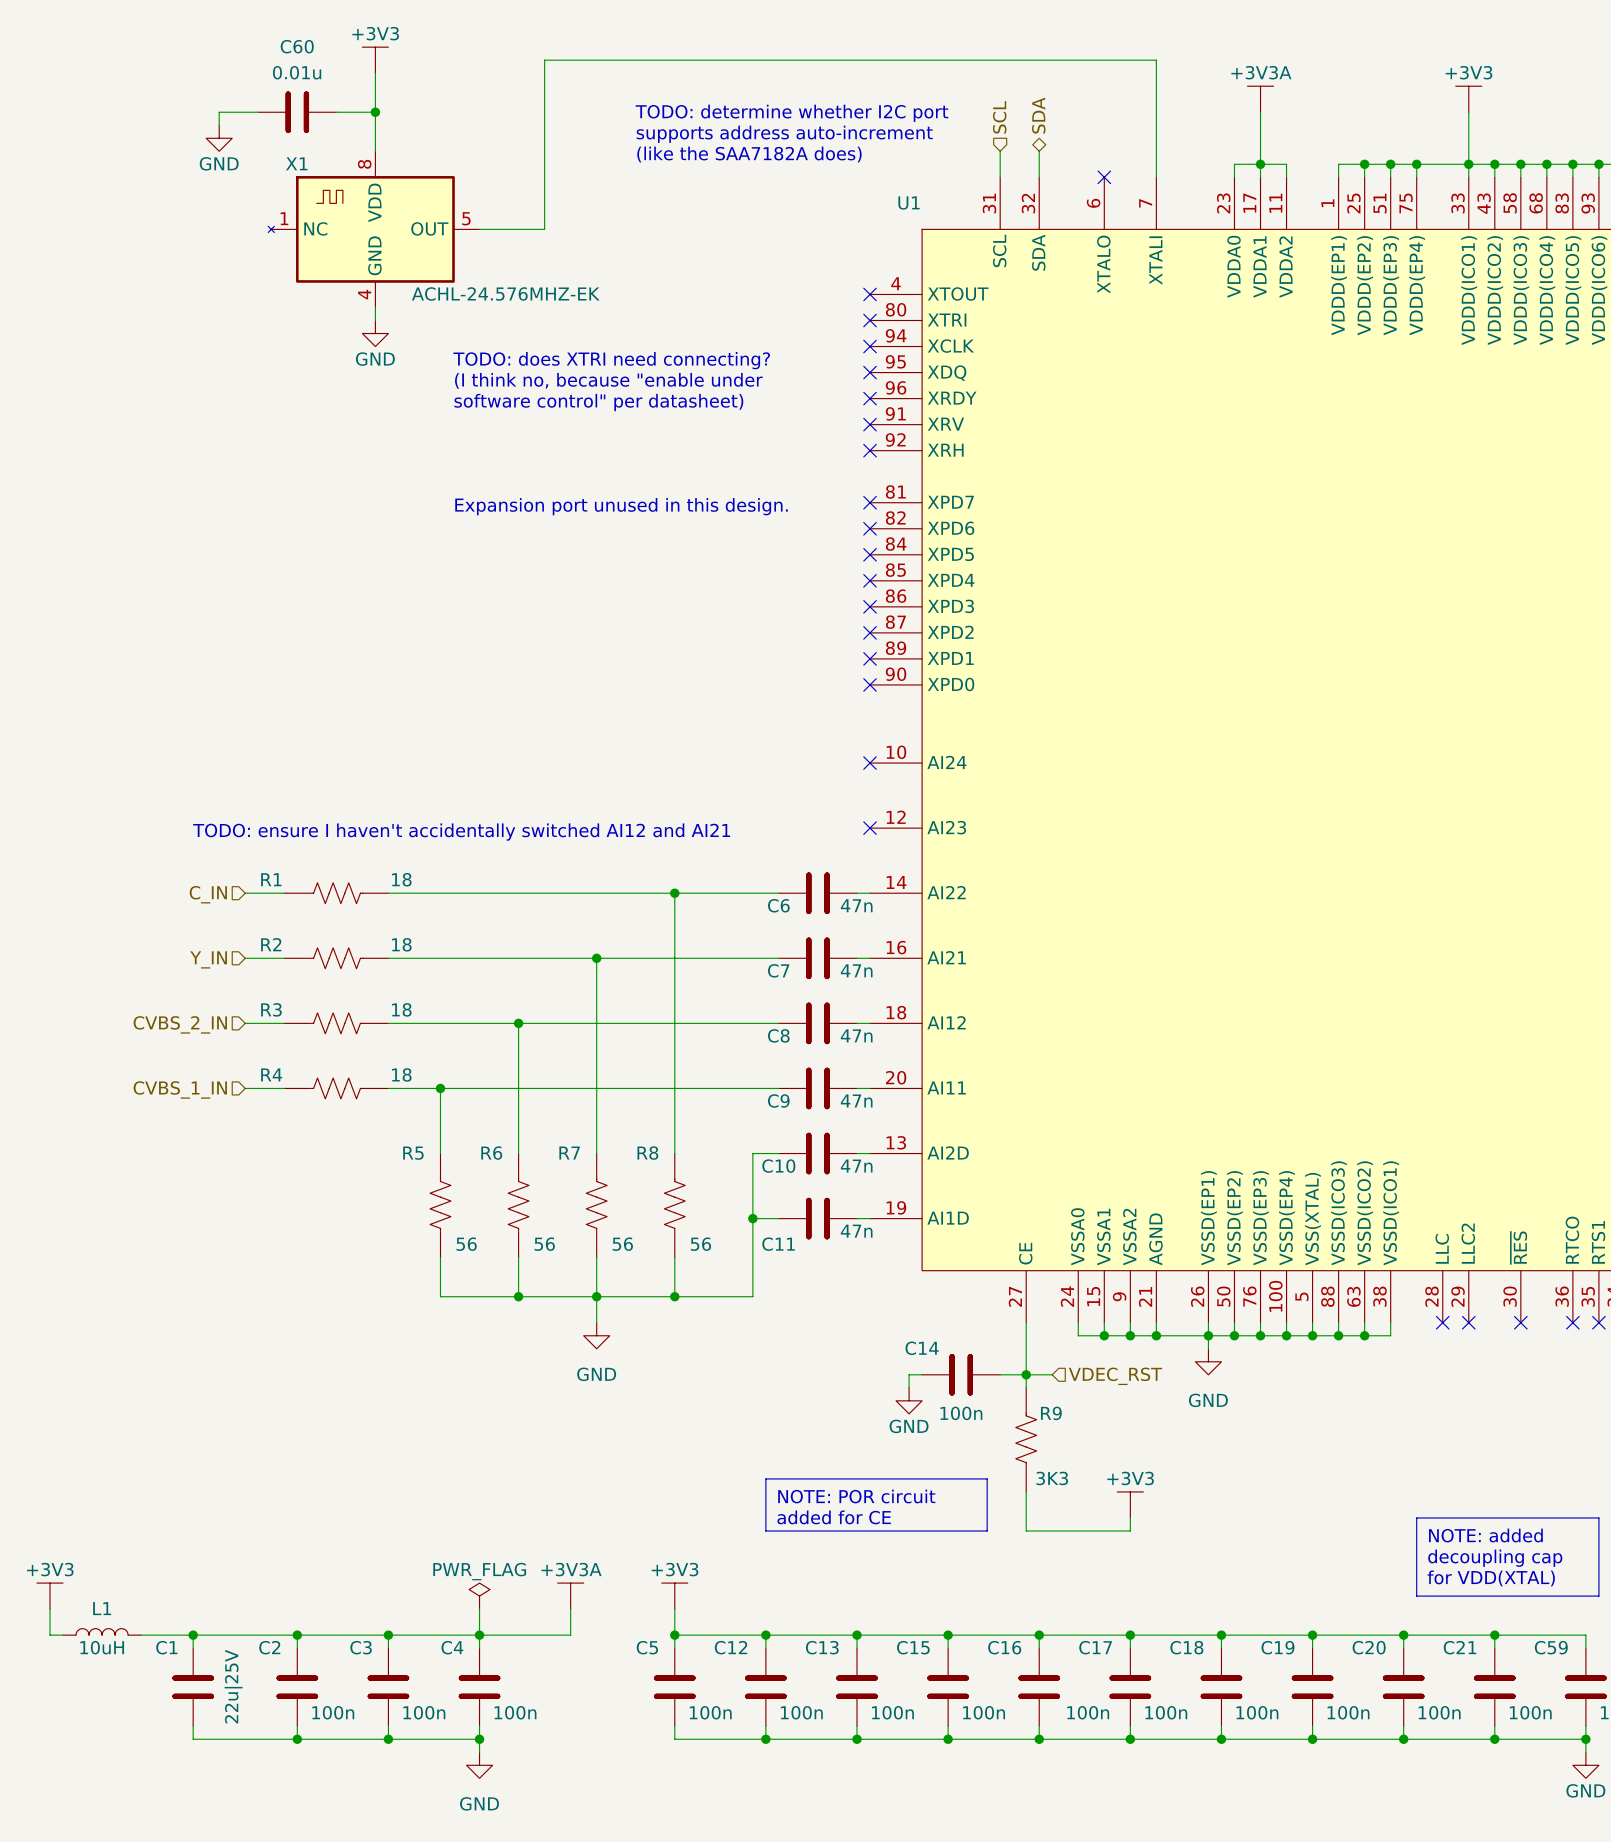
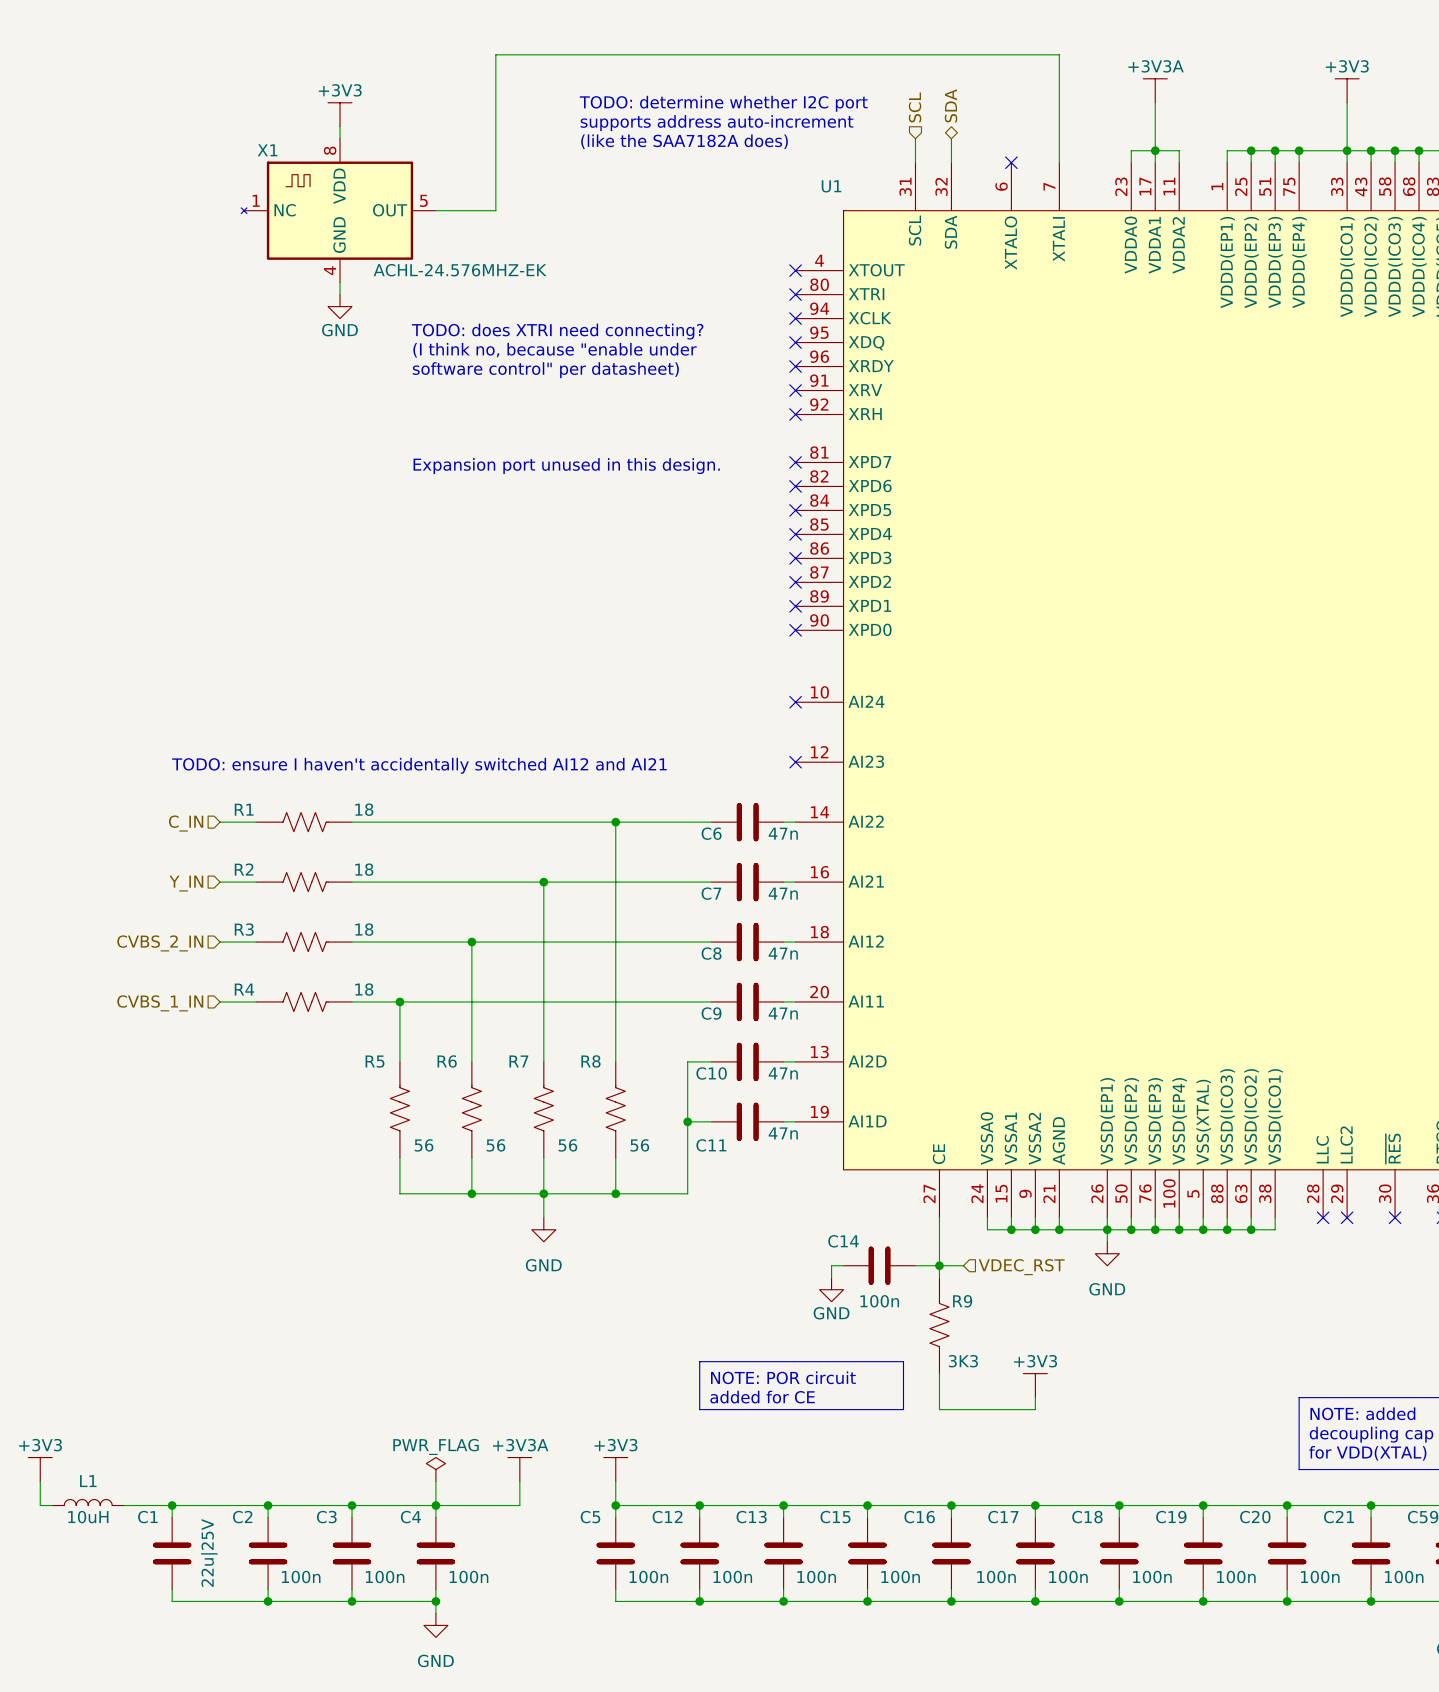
power symbol position: +3V3 (375, 60) -> +3V3 (340, 114)
wire: (375, 73) (375, 138) -> none
wire: (258, 112) (219, 112) (219, 125) -> none
C60: 0.01u (297, 112) -> none
wire: (336, 112) (375, 112) -> none
junction: (375, 112) -> none
power symbol: GND (219, 138) -> none

